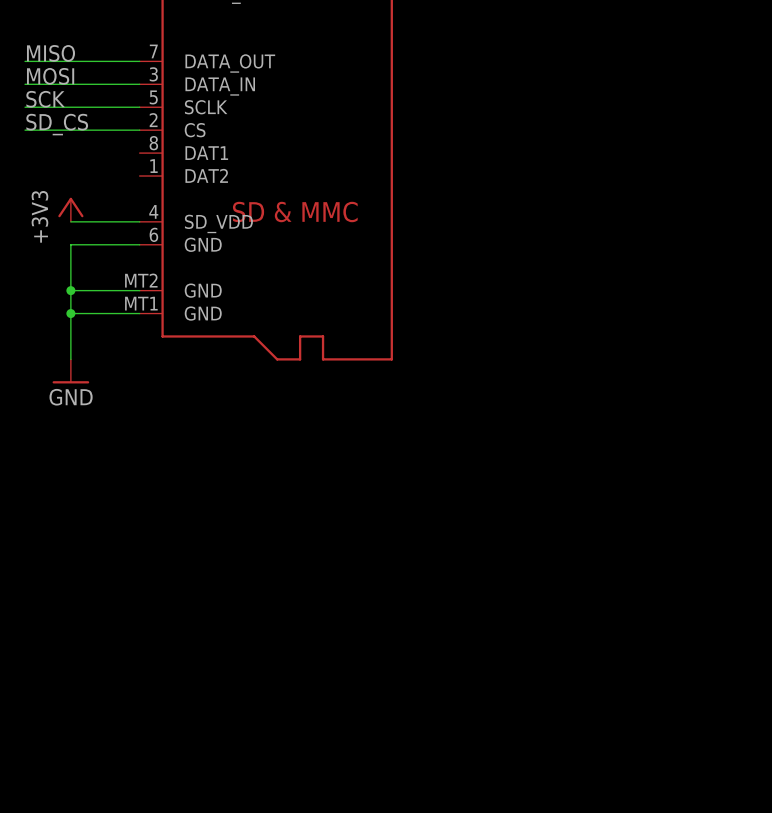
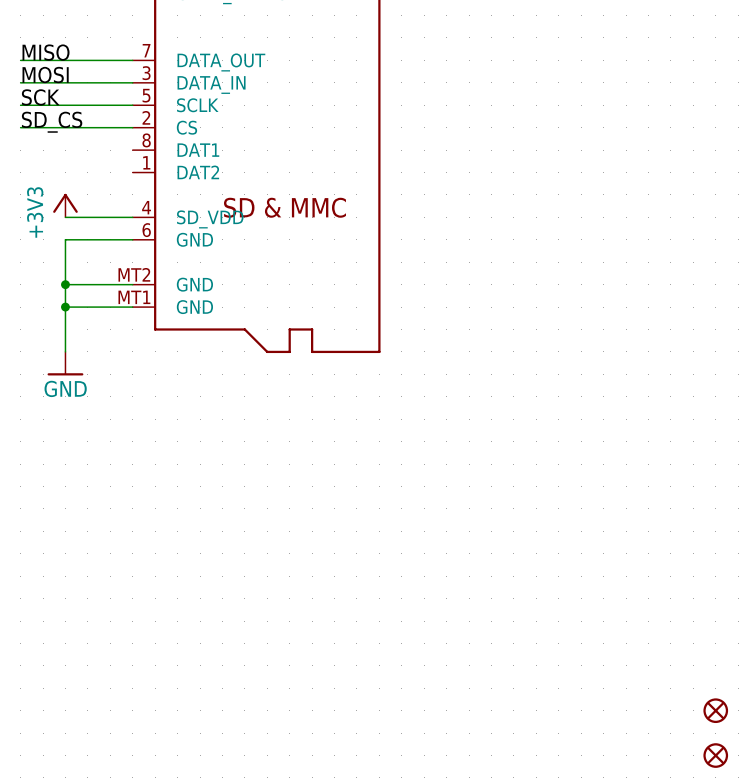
part: none -> (715, 710)
part: none -> (715, 755)

